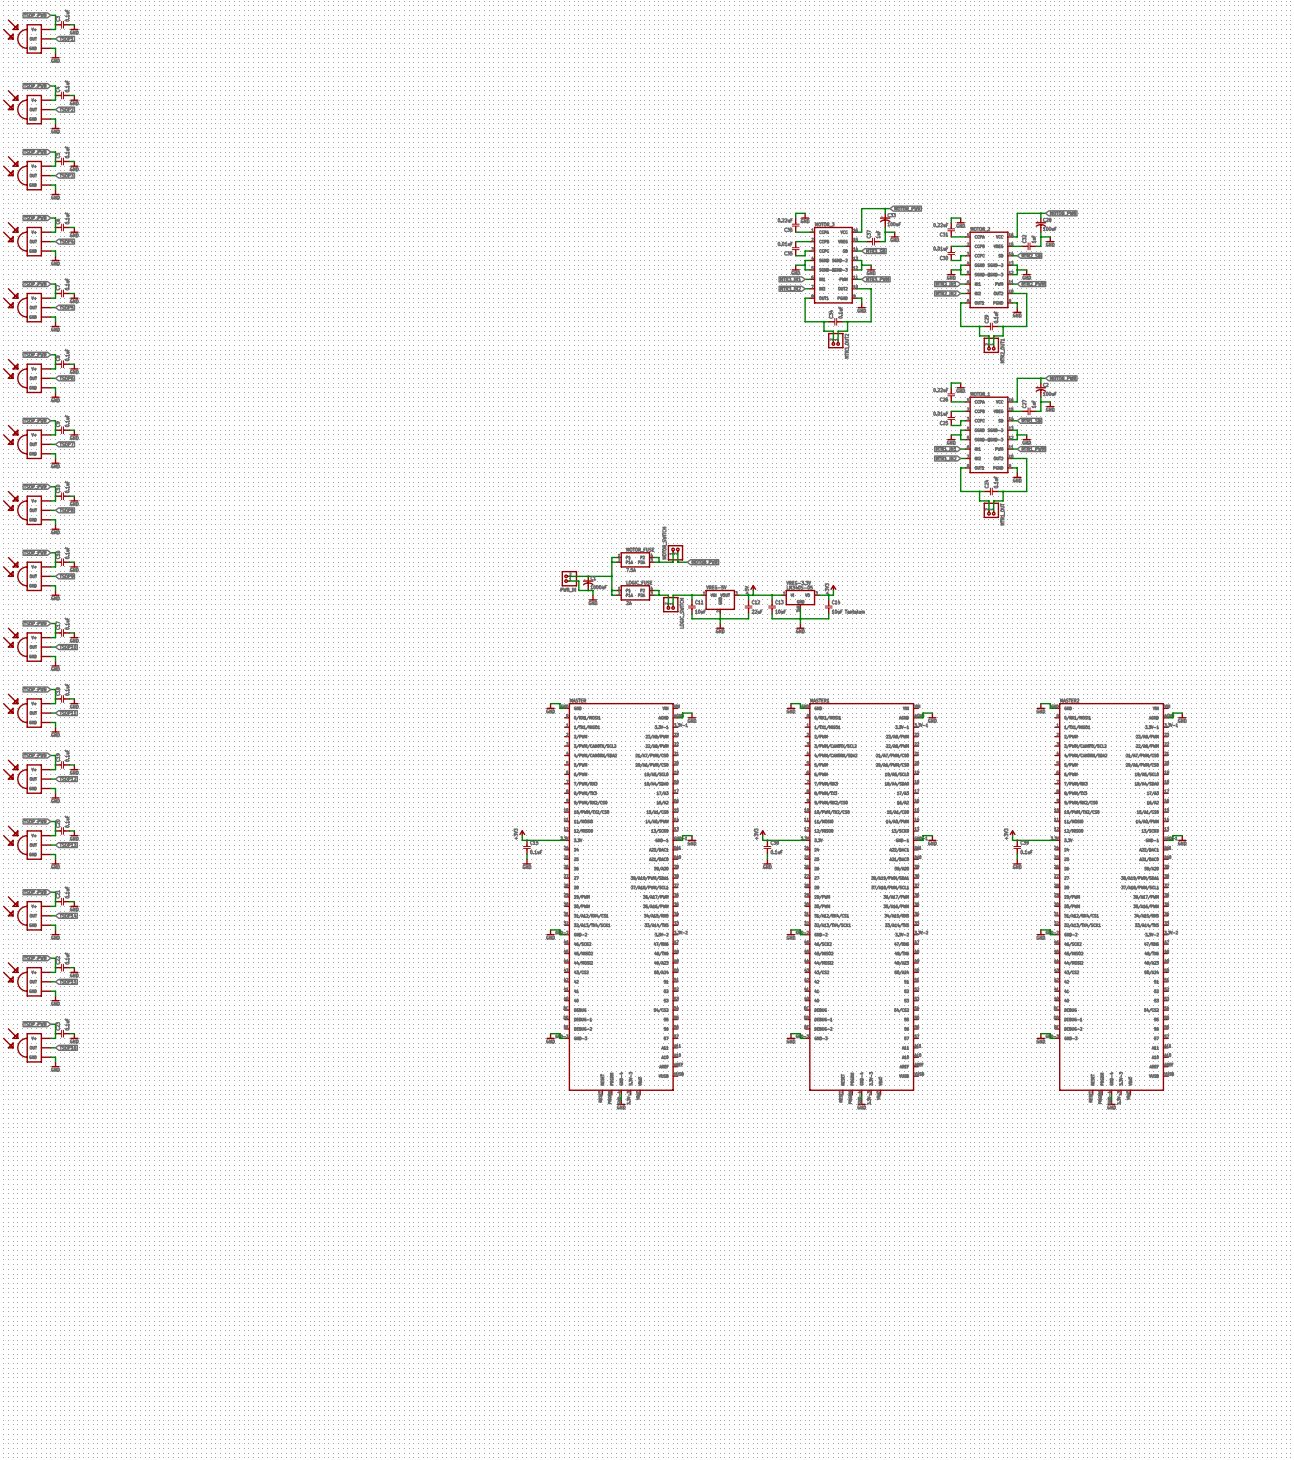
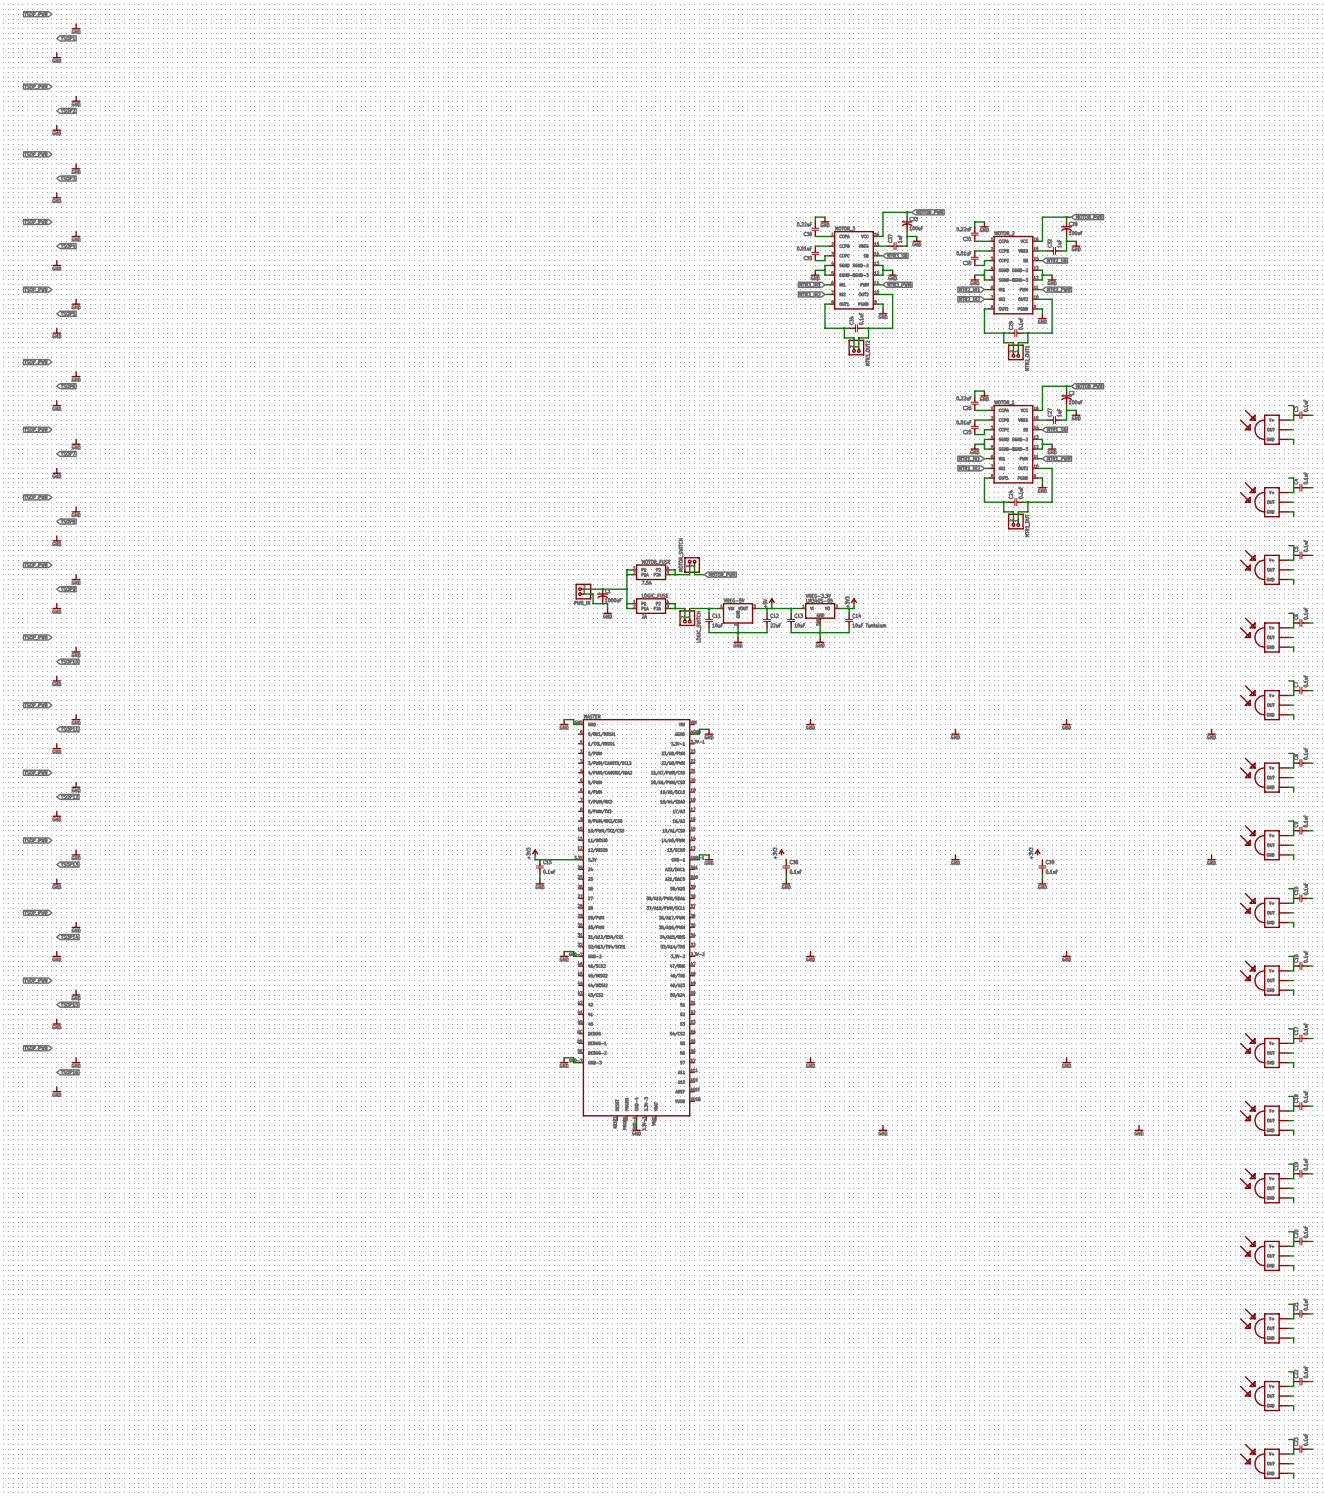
wire: (50, 15) (55, 15) (55, 29) (50, 29) -> none
part position: (62, 24) -> (1300, 415)
wire: (69, 24) (74, 24) -> none
part: (27, 36) -> none
wire: (50, 38) (55, 38) -> none
wire: (50, 48) (55, 48) (55, 53) -> none
wire: (50, 86) (55, 86) (55, 100) (50, 100) -> none
part position: (62, 95) -> (1300, 487)
wire: (69, 95) (74, 95) -> none
part: (27, 107) -> none
wire: (50, 109) (55, 109) -> none
wire: (50, 119) (55, 119) (55, 123) -> none
wire: (50, 152) (55, 152) (55, 166) (50, 166) -> none
part position: (62, 161) -> (1300, 555)
wire: (69, 161) (74, 161) -> none
part: (27, 173) -> none
wire: (50, 175) (55, 175) -> none
wire: (50, 185) (55, 185) (55, 189) -> none
wire: (50, 218) (55, 218) (55, 232) (50, 232) -> none
part position: (62, 227) -> (1300, 622)
wire: (69, 227) (74, 227) -> none
part: (27, 239) -> none
wire: (50, 241) (55, 241) -> none
wire: (50, 251) (55, 251) (55, 255) -> none
wire: (50, 284) (55, 284) (55, 298) (50, 298) -> none
part position: (62, 293) -> (1300, 690)
wire: (69, 293) (74, 293) -> none
part: (27, 305) -> none
wire: (50, 307) (55, 307) -> none
wire: (50, 317) (55, 317) (55, 321) -> none
wire: (50, 354) (55, 354) (55, 368) (50, 368) -> none
part position: (62, 364) -> (1300, 763)
wire: (69, 364) (74, 364) -> none
part: (27, 375) -> none
wire: (50, 378) (55, 378) -> none
wire: (50, 387) (55, 387) (55, 392) -> none
wire: none -> (1288, 405) (1293, 405) (1293, 420) (1288, 420)
wire: none -> (1308, 415) (1312, 415)
part: none -> (1264, 427)
wire: (50, 420) (55, 420) (55, 434) (50, 434) -> none
wire: none -> (1288, 429) (1293, 429)
part position: (62, 430) -> (1300, 830)
wire: (69, 430) (74, 430) -> none
wire: none -> (1288, 439) (1293, 439) (1293, 444)
part: (27, 441) -> none
wire: (50, 444) (55, 444) -> none
wire: (50, 453) (55, 453) (55, 458) -> none
wire: none -> (1288, 478) (1293, 478) (1293, 492) (1288, 492)
wire: none -> (1308, 487) (1312, 487)
wire: (50, 486) (55, 486) (55, 500) (50, 500) -> none
part: none -> (1264, 499)
wire: none -> (1288, 502) (1293, 502)
part position: (62, 496) -> (1300, 898)
wire: (69, 496) (74, 496) -> none
wire: none -> (1288, 511) (1293, 511) (1293, 516)
part: (27, 507) -> none
wire: (50, 510) (55, 510) -> none
wire: (50, 519) (55, 519) (55, 524) -> none
wire: none -> (1288, 545) (1293, 545) (1293, 560) (1288, 560)
wire: none -> (1308, 555) (1312, 555)
wire: (50, 552) (55, 552) (55, 566) (50, 566) -> none
part: none -> (1264, 567)
wire: none -> (1288, 569) (1293, 569)
part position: (62, 562) -> (1300, 966)
wire: (69, 562) (74, 562) -> none
wire: none -> (1288, 579) (1293, 579) (1293, 584)
part: (27, 574) -> none
wire: (50, 576) (55, 576) -> none
wire: (50, 585) (55, 585) (55, 590) -> none
wire: none -> (1288, 613) (1293, 613) (1293, 627) (1288, 627)
wire: none -> (1308, 622) (1312, 622)
part: none -> (1264, 635)
wire: (50, 623) (55, 623) (55, 637) (50, 637) -> none
wire: none -> (1288, 637) (1293, 637)
part position: (62, 632) -> (1300, 1038)
wire: (69, 632) (74, 632) -> none
wire: none -> (1288, 647) (1293, 647) (1293, 651)
part: (27, 644) -> none
wire: (50, 647) (55, 647) -> none
wire: (50, 656) (55, 656) (55, 661) -> none
wire: none -> (1288, 680) (1293, 680) (1293, 695) (1288, 695)
wire: none -> (1308, 690) (1312, 690)
part: none -> (1264, 702)
wire: (50, 689) (55, 689) (55, 703) (50, 703) -> none
wire: none -> (1288, 705) (1293, 705)
part position: (62, 698) -> (1300, 1106)
wire: (69, 698) (74, 698) -> none
wire: none -> (1288, 714) (1293, 714) (1293, 719)
wire: (790, 703) (800, 703) (800, 708) (805, 708) -> none
wire: (1040, 703) (1050, 703) (1050, 708) (1054, 708) -> none
part: (27, 710) -> none
wire: (50, 713) (55, 713) -> none
wire: (932, 713) (922, 713) (922, 717) (918, 717) -> none
wire: (1182, 713) (1172, 713) (1172, 717) (1168, 717) -> none
wire: (50, 722) (55, 722) (55, 727) -> none
wire: none -> (1288, 753) (1293, 753) (1293, 767) (1288, 767)
wire: none -> (1308, 763) (1312, 763)
wire: (50, 755) (55, 755) (55, 769) (50, 769) -> none
part: none -> (1264, 775)
wire: none -> (1288, 777) (1293, 777)
part position: (62, 764) -> (1300, 1173)
wire: (69, 764) (74, 764) -> none
wire: none -> (1288, 787) (1293, 787) (1293, 792)
part: (27, 776) -> none
wire: (50, 779) (55, 779) -> none
wire: (50, 788) (55, 788) (55, 793) -> none
wire: none -> (1288, 821) (1293, 821) (1293, 835) (1288, 835)
wire: none -> (1308, 830) (1312, 830)
wire: (50, 821) (55, 821) (55, 835) (50, 835) -> none
part: none -> (1264, 842)
wire: none -> (1288, 845) (1293, 845)
part position: (62, 830) -> (1300, 1241)
wire: (69, 830) (74, 830) -> none
wire: (762, 835) (762, 840) (805, 840) -> none
wire: (932, 835) (922, 835) (922, 840) (918, 840) -> none
wire: (1012, 835) (1012, 840) (1054, 840) -> none
wire: (1182, 835) (1172, 835) (1172, 840) (1168, 840) -> none
wire: none -> (1288, 854) (1293, 854) (1293, 859)
part: (27, 842) -> none
wire: (50, 845) (55, 845) -> none
wire: (50, 854) (55, 854) (55, 859) -> none
wire: none -> (1288, 888) (1293, 888) (1293, 903) (1288, 903)
wire: none -> (1308, 898) (1312, 898)
part: none -> (1264, 910)
wire: (50, 892) (55, 892) (55, 906) (50, 906) -> none
wire: none -> (1288, 912) (1293, 912)
part: (861, 899) -> none
part: (1111, 899) -> none
part position: (62, 901) -> (1300, 1313)
wire: (69, 901) (74, 901) -> none
wire: none -> (1288, 922) (1293, 922) (1293, 927)
part: (27, 913) -> none
wire: (50, 915) (55, 915) -> none
wire: (50, 925) (55, 925) (55, 929) -> none
wire: (790, 929) (800, 929) (800, 934) (805, 934) -> none
wire: (1040, 929) (1050, 929) (1050, 934) (1054, 934) -> none
wire: none -> (1288, 956) (1293, 956) (1293, 970) (1288, 970)
wire: none -> (1308, 966) (1312, 966)
part: none -> (1264, 978)
wire: (50, 958) (55, 958) (55, 972) (50, 972) -> none
wire: none -> (1288, 980) (1293, 980)
part position: (62, 967) -> (1300, 1381)
wire: (69, 967) (74, 967) -> none
wire: none -> (1288, 990) (1293, 990) (1293, 995)
part: (27, 979) -> none
wire: (50, 981) (55, 981) -> none
wire: (50, 991) (55, 991) (55, 995) -> none
wire: none -> (1288, 1028) (1293, 1028) (1293, 1043) (1288, 1043)
wire: none -> (1308, 1038) (1312, 1038)
wire: (50, 1024) (55, 1024) (55, 1038) (50, 1038) -> none
part: none -> (1264, 1050)
wire: none -> (1288, 1053) (1293, 1053)
part position: (62, 1033) -> (1300, 1449)
wire: (69, 1033) (74, 1033) -> none
wire: (790, 1033) (800, 1033) (800, 1038) (805, 1038) -> none
wire: (1040, 1033) (1050, 1033) (1050, 1038) (1054, 1038) -> none
wire: none -> (1288, 1062) (1293, 1062) (1293, 1067)
part: (27, 1045) -> none
wire: (50, 1047) (55, 1047) -> none
wire: (50, 1057) (55, 1057) (55, 1061) -> none
wire: none -> (1288, 1096) (1293, 1096) (1293, 1110) (1288, 1110)
wire: none -> (1308, 1106) (1312, 1106)
part: none -> (1264, 1118)
wire: (861, 1094) (861, 1099) -> none
wire: (1111, 1094) (1111, 1099) -> none
wire: none -> (1288, 1120) (1293, 1120)
wire: none -> (1288, 1130) (1293, 1130) (1293, 1135)
wire: none -> (1288, 1164) (1293, 1164) (1293, 1178) (1288, 1178)
wire: none -> (1308, 1173) (1312, 1173)
part: none -> (1264, 1185)
wire: none -> (1288, 1188) (1293, 1188)
wire: none -> (1288, 1197) (1293, 1197) (1293, 1202)
wire: none -> (1288, 1231) (1293, 1231) (1293, 1246) (1288, 1246)
wire: none -> (1308, 1241) (1312, 1241)
part: none -> (1264, 1253)
wire: none -> (1288, 1255) (1293, 1255)
wire: none -> (1288, 1265) (1293, 1265) (1293, 1270)
wire: none -> (1288, 1304) (1293, 1304) (1293, 1318) (1288, 1318)
wire: none -> (1308, 1313) (1312, 1313)
part: none -> (1264, 1325)
wire: none -> (1288, 1328) (1293, 1328)
wire: none -> (1288, 1338) (1293, 1338) (1293, 1342)
wire: none -> (1288, 1371) (1293, 1371) (1293, 1386) (1288, 1386)
wire: none -> (1308, 1381) (1312, 1381)
part: none -> (1264, 1393)
wire: none -> (1288, 1396) (1293, 1396)
wire: none -> (1288, 1405) (1293, 1405) (1293, 1410)
wire: none -> (1288, 1439) (1293, 1439) (1293, 1454) (1288, 1454)
wire: none -> (1308, 1449) (1312, 1449)
part: none -> (1264, 1461)
wire: none -> (1288, 1463) (1293, 1463)
wire: none -> (1288, 1473) (1293, 1473) (1293, 1478)

